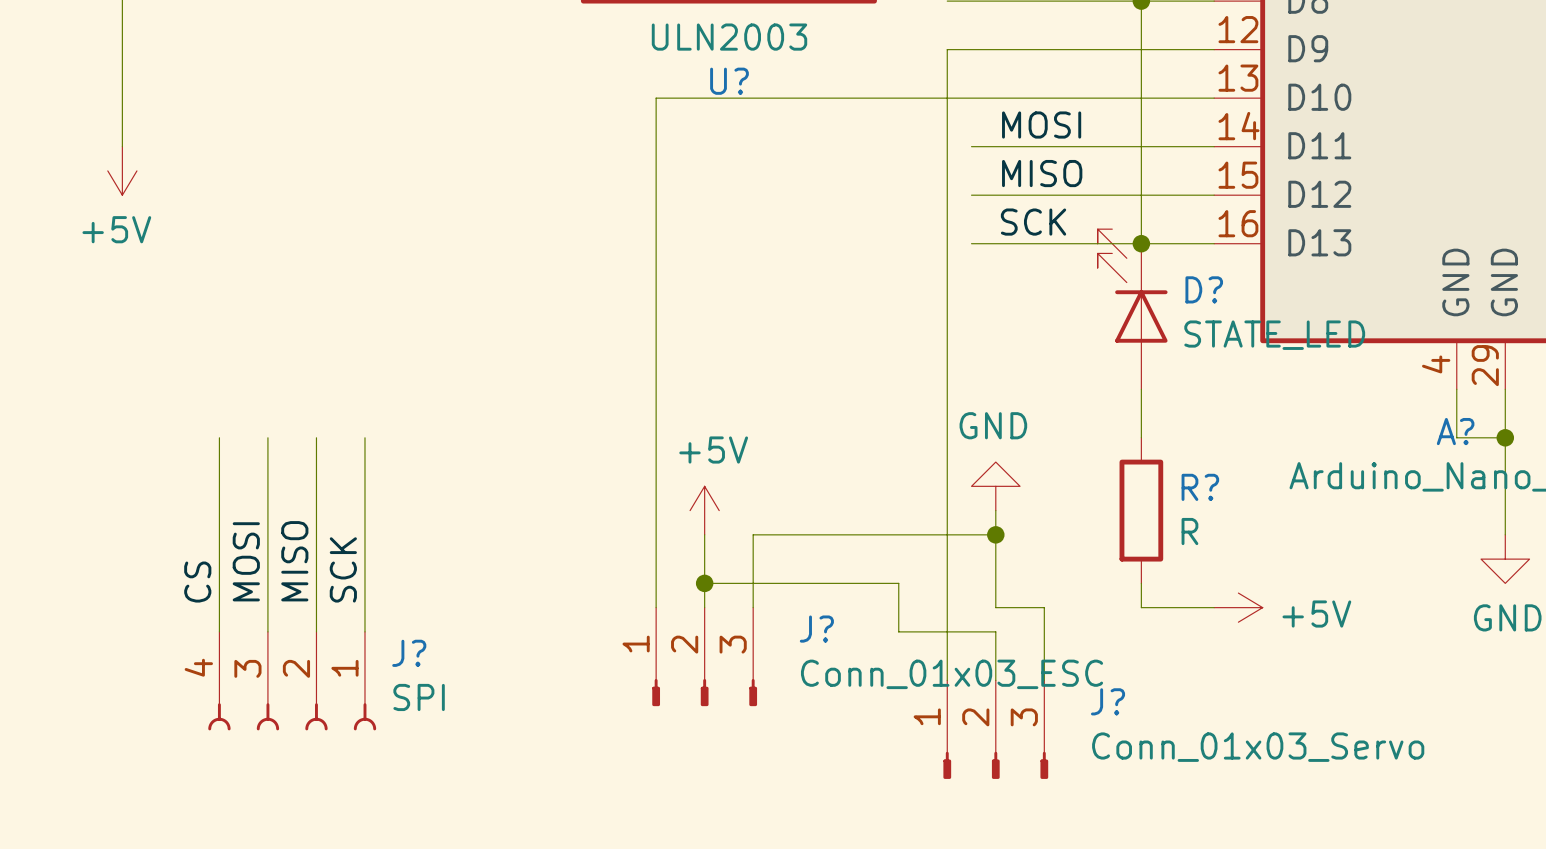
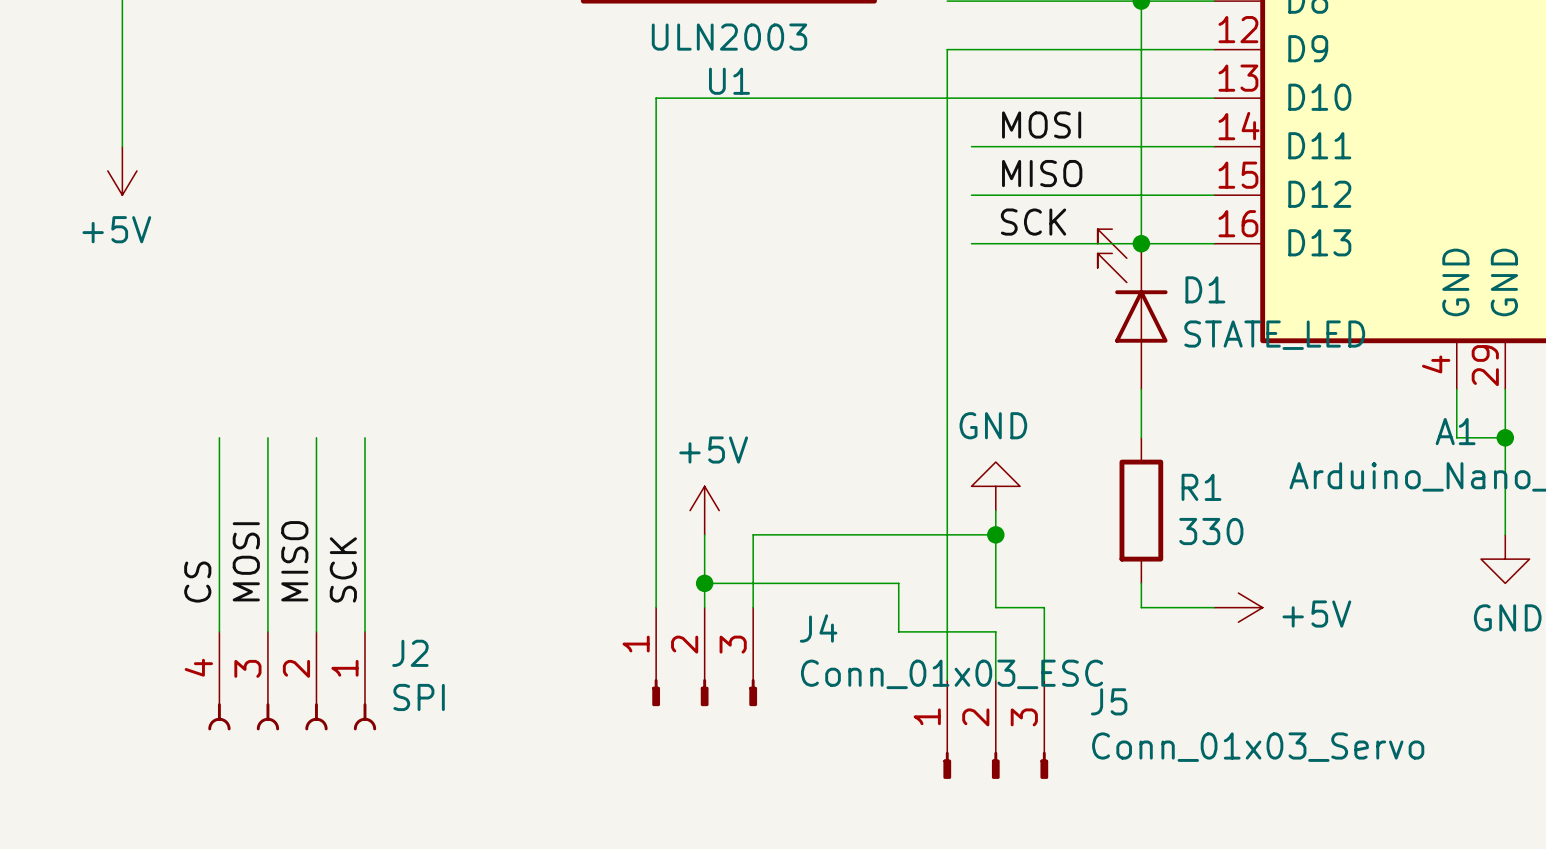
U? name: U? (729, 81) -> U1 (729, 81)
D? name: D? (1204, 289) -> D1 (1205, 289)
A? name: A? (1455, 431) -> A1 (1455, 431)
R? name: R? (1200, 487) -> R1 (1201, 487)
R? value: R (1189, 531) -> 330 (1211, 531)
J? name: J? (816, 629) -> J4 (818, 628)
J? name: J? (409, 653) -> J2 (410, 653)
J? name: J? (1108, 701) -> J5 (1109, 701)

